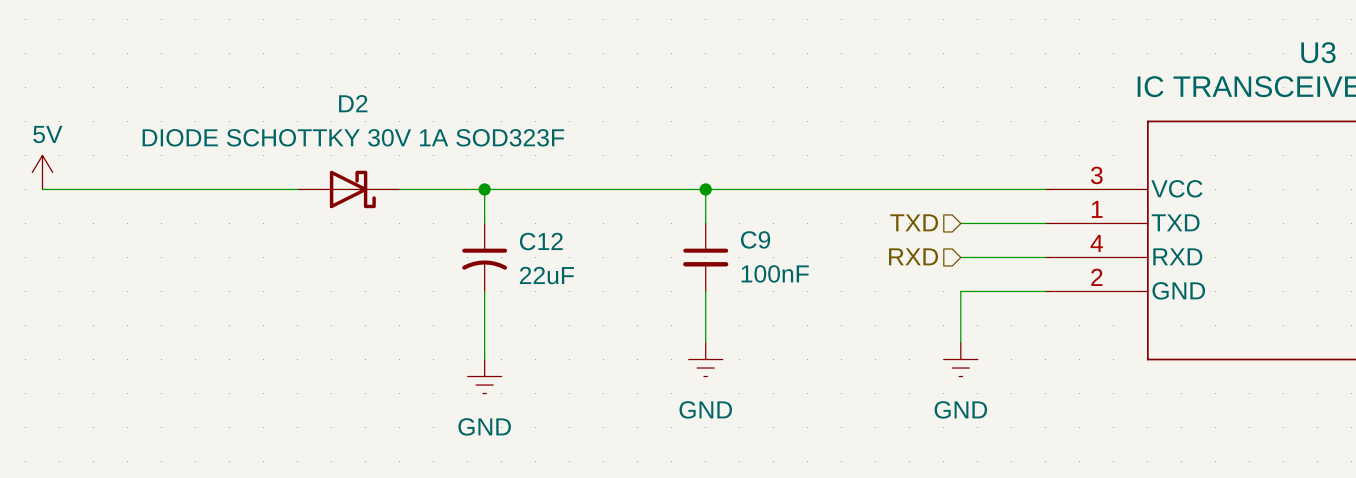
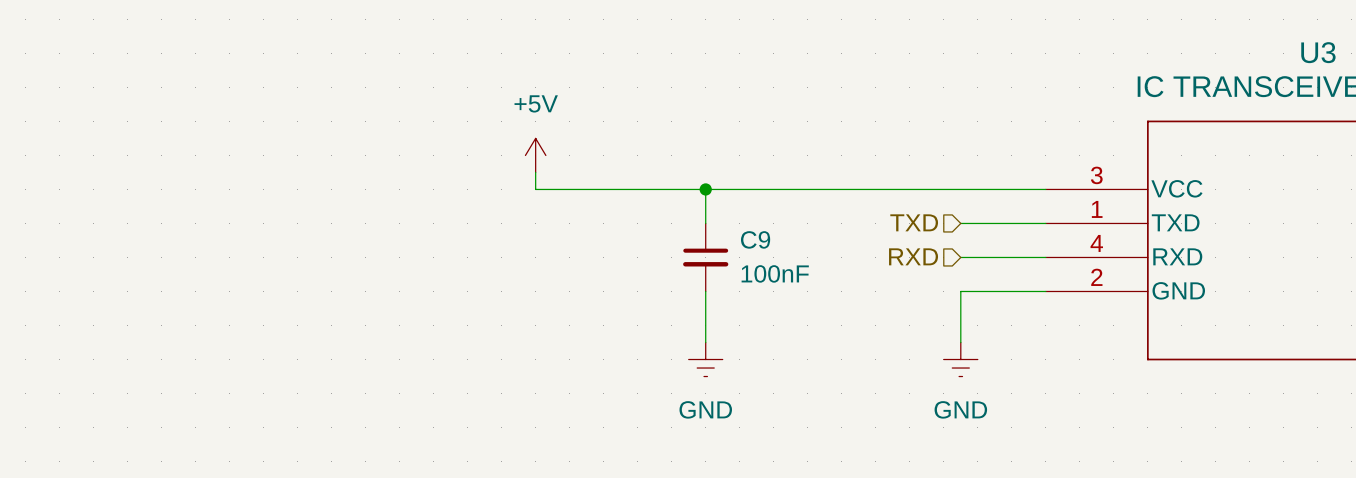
power symbol: none -> +5V (535, 155)
power symbol: 5V (42, 172) -> none
wire: (42, 189) (297, 189) -> none
D2: DIODE SCHOTTKY 30V 1A SOD323F (348, 189) -> none
wire: (399, 189) (535, 189) -> (535, 172) (535, 189)
wire: (484, 189) (484, 223) -> none
junction: (484, 189) -> none
C12: 22uF (484, 257) -> none
wire: (484, 291) (484, 359) -> none
power symbol: GND (484, 376) -> none

